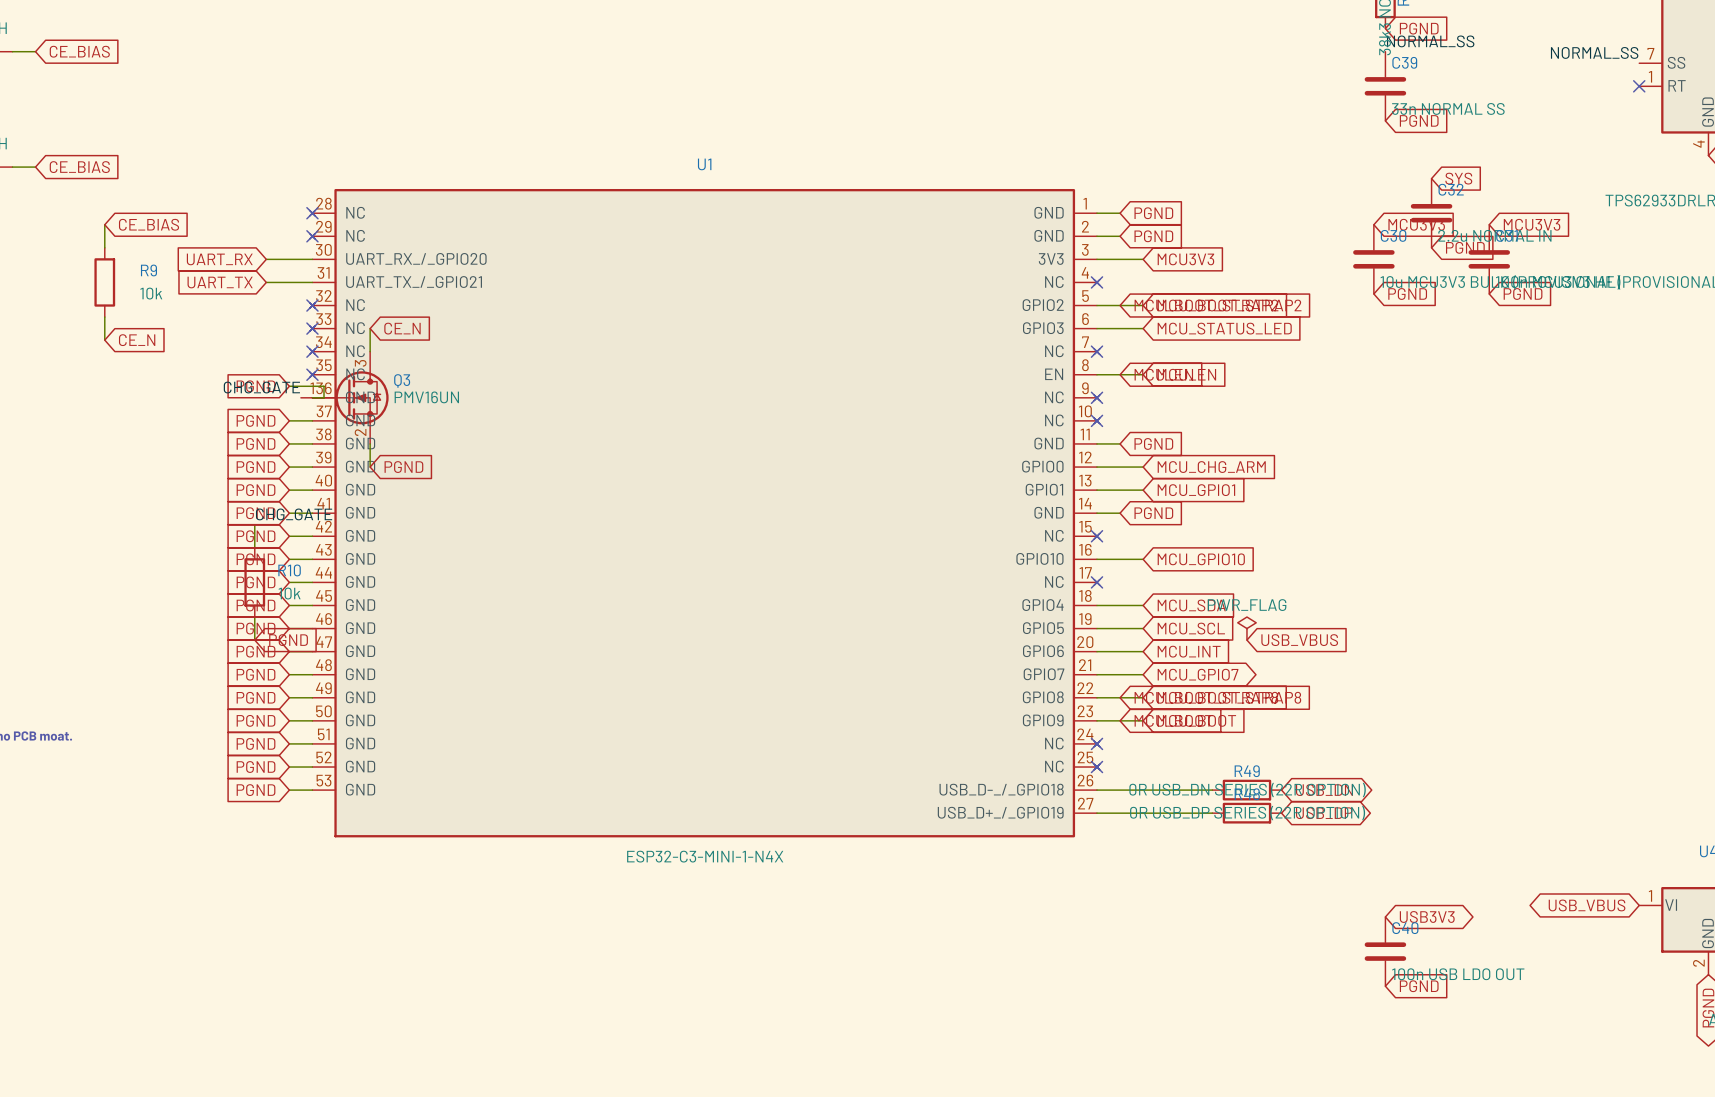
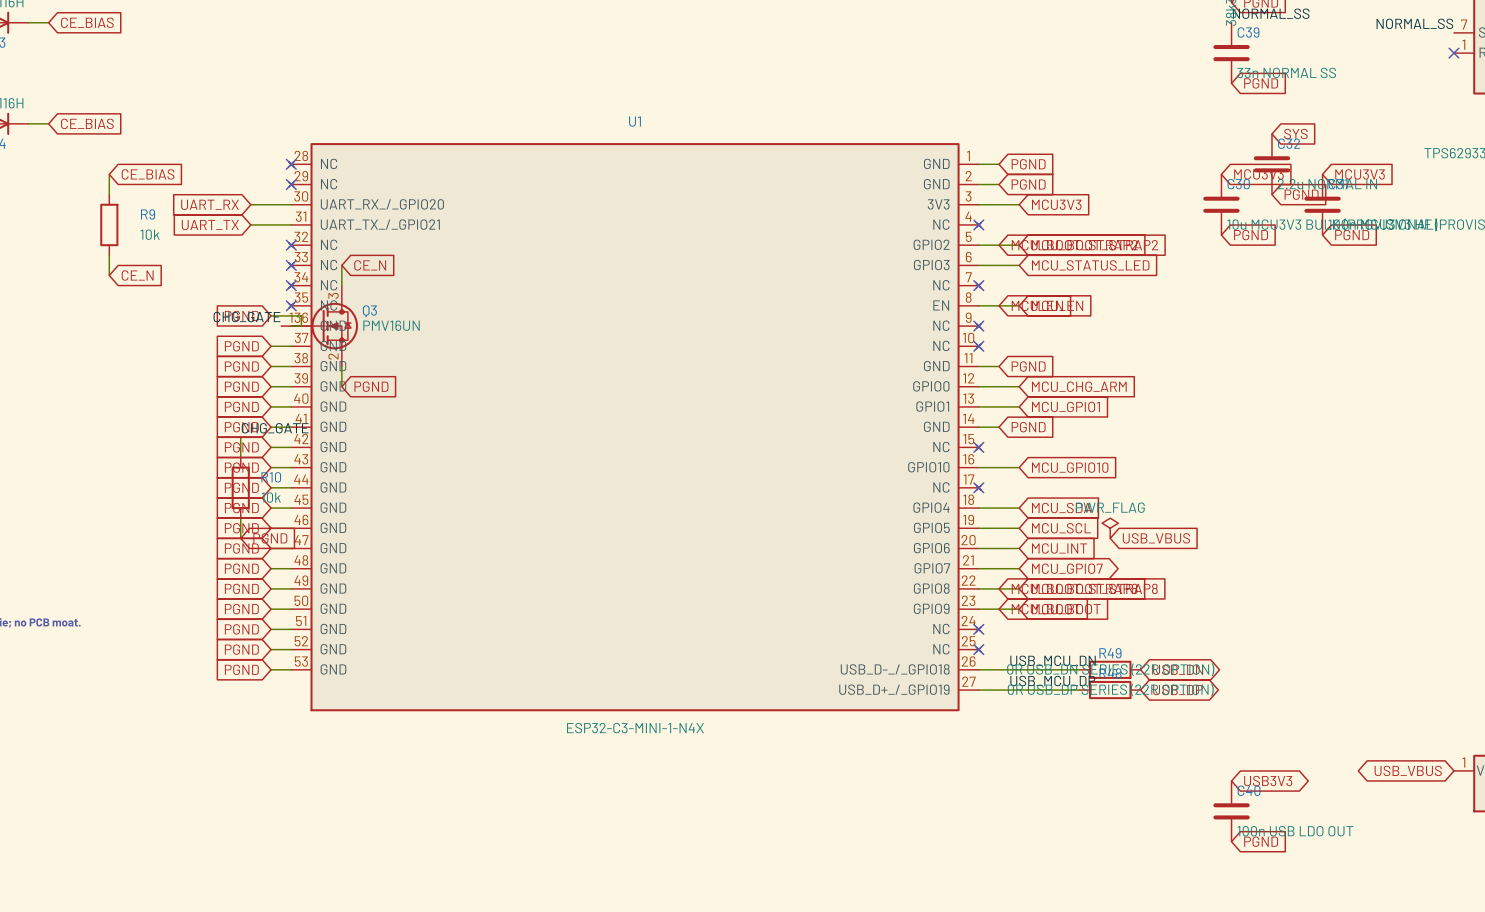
label: none -> USB_MCU_DN (1053, 660)
label: none -> USB_MCU_DP (1052, 681)

